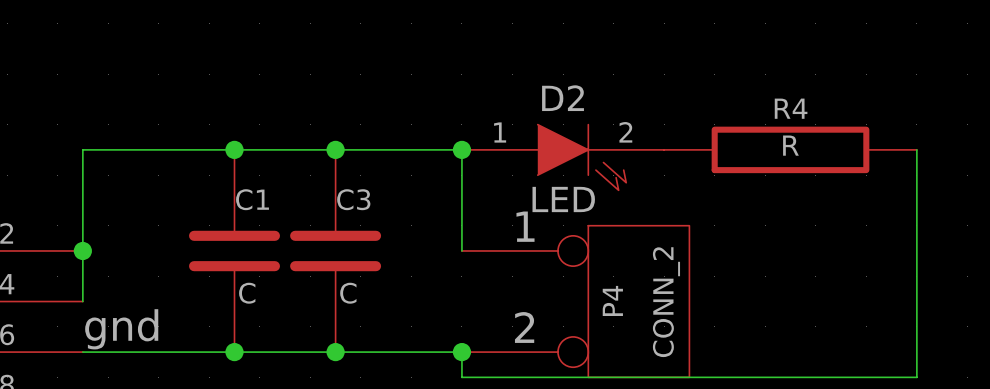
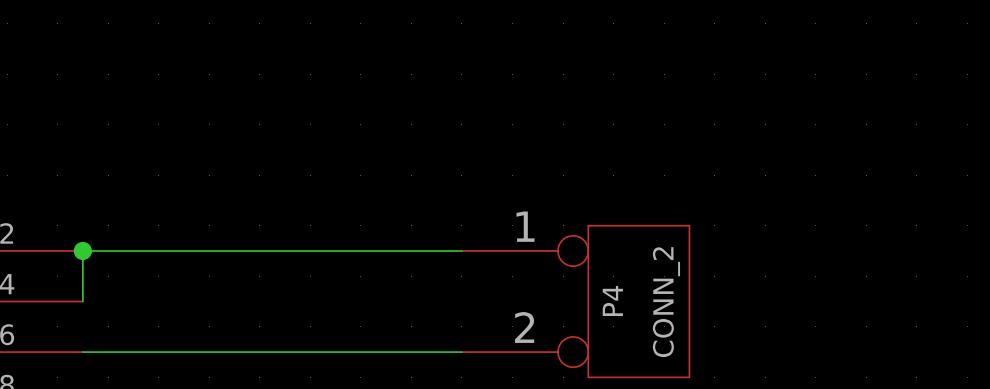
junction: (234, 149) -> none
junction: (335, 149) -> none
junction: (461, 149) -> none
R4: R (790, 149) -> none
wire: (916, 149) (916, 377) (461, 377) (461, 352) -> none
D2: LED (563, 157) -> none
wire: (82, 250) (82, 149) (461, 149) (461, 250) -> (82, 250) (461, 250)
C1: C (234, 250) -> none
C3: C (335, 250) -> none
label: gnd (121, 329) -> none
junction: (234, 352) -> none
junction: (335, 352) -> none
junction: (461, 352) -> none

